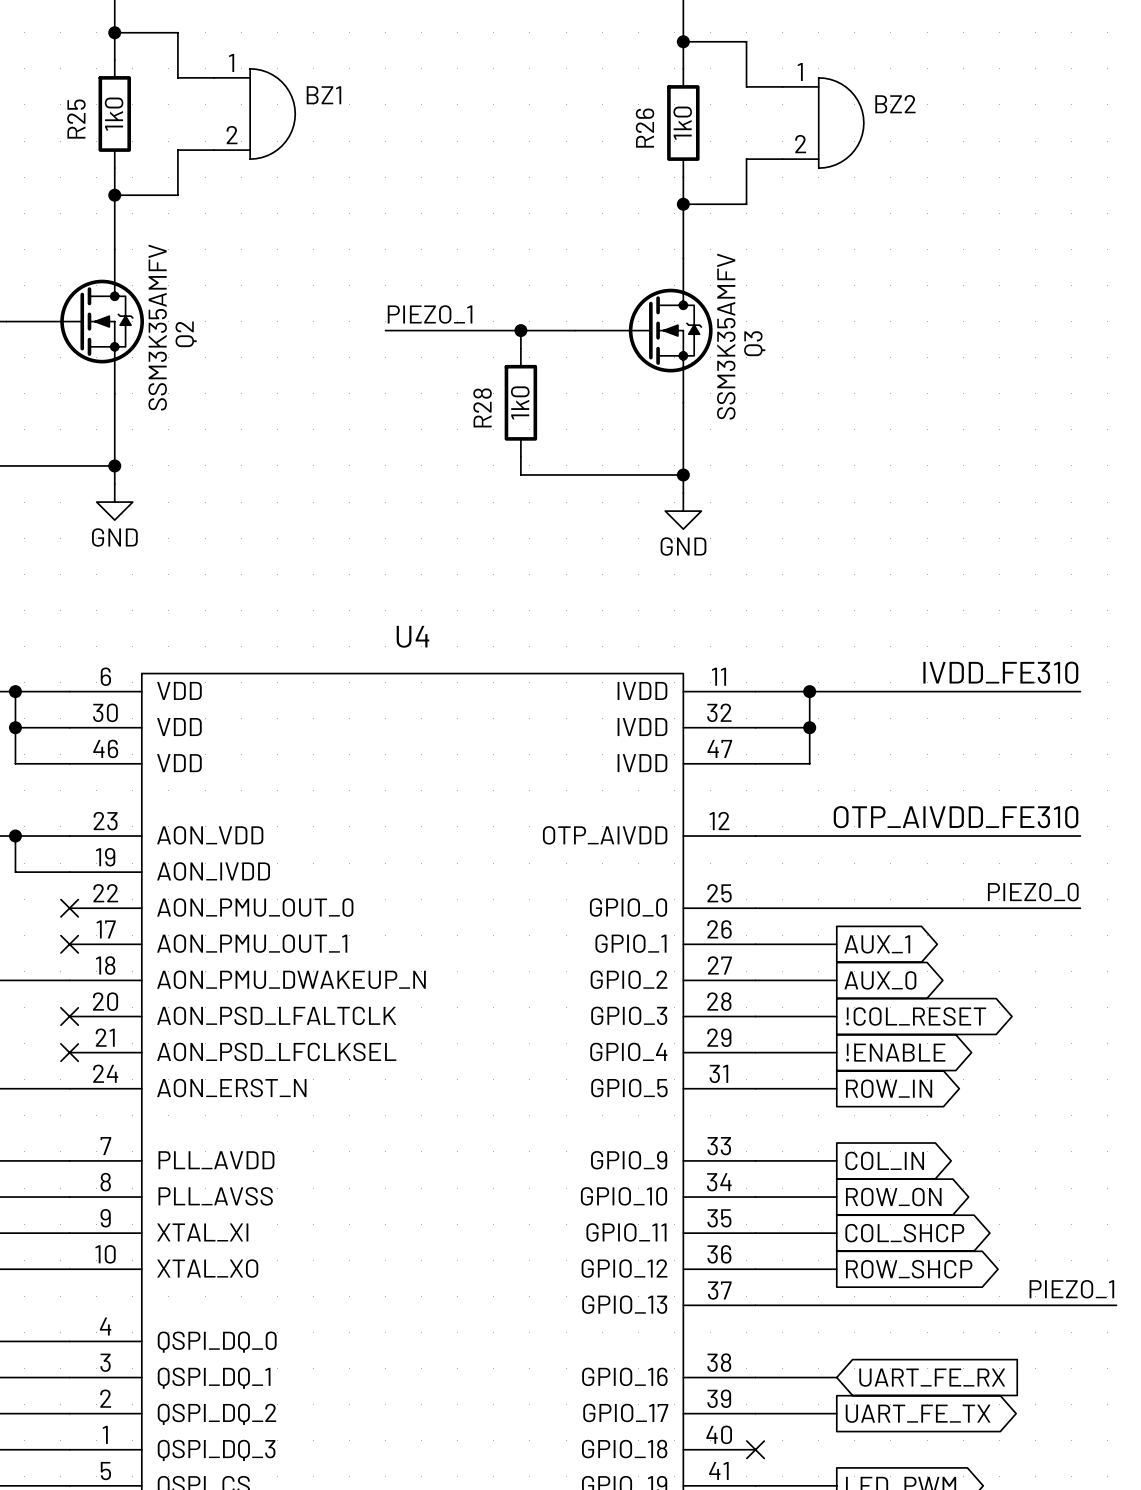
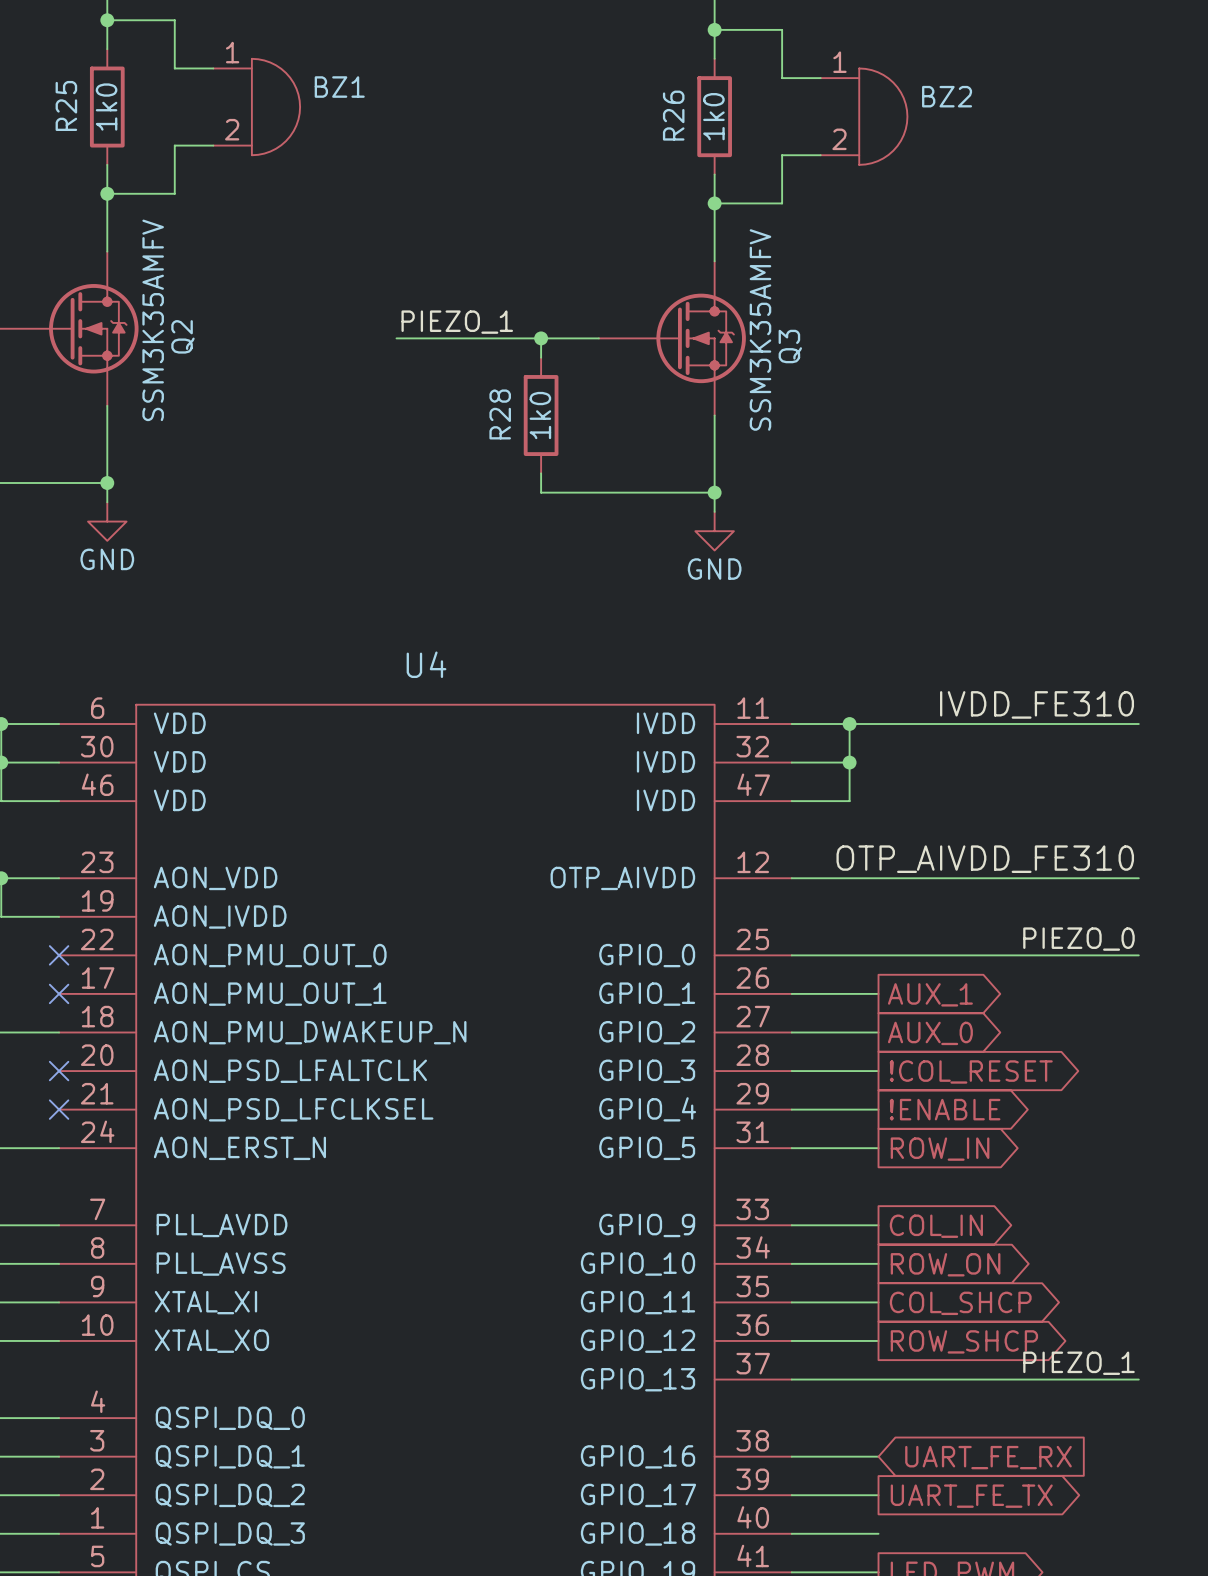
label position: PIEZO_1 (1071, 1289) -> PIEZO_1 (1078, 1363)
wire: (1080, 1305) (1116, 1305) -> none
wire: none -> (791, 1533) (878, 1533)
no-connect mark: (755, 1449) -> none

